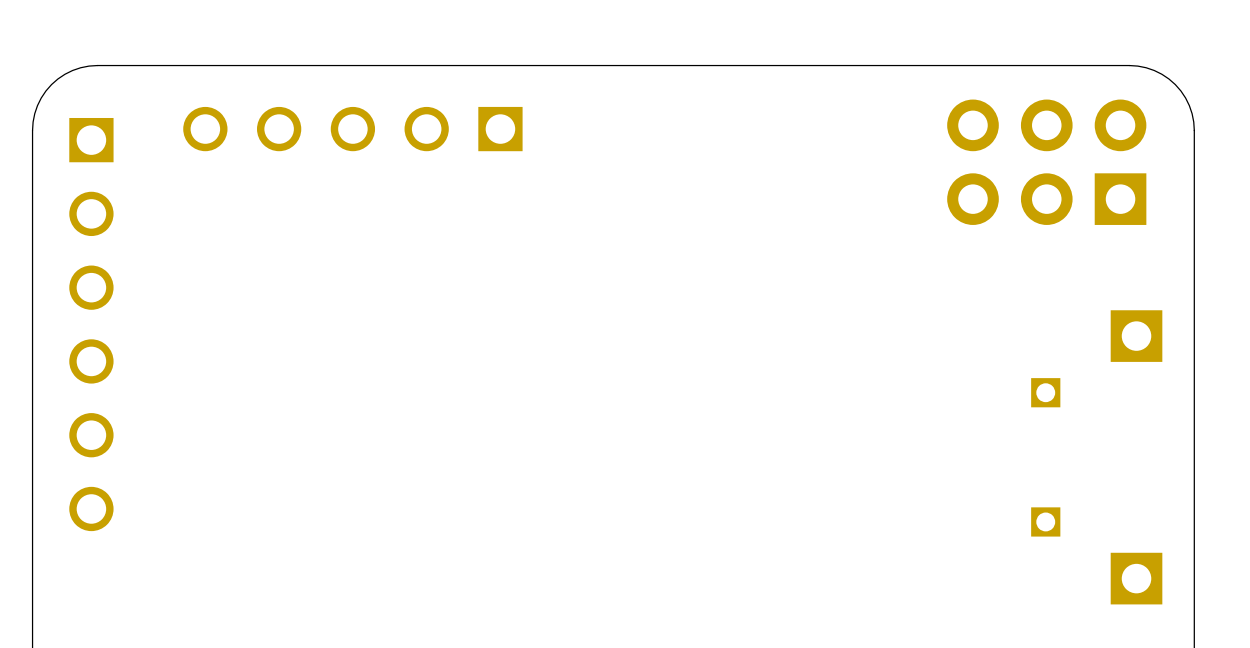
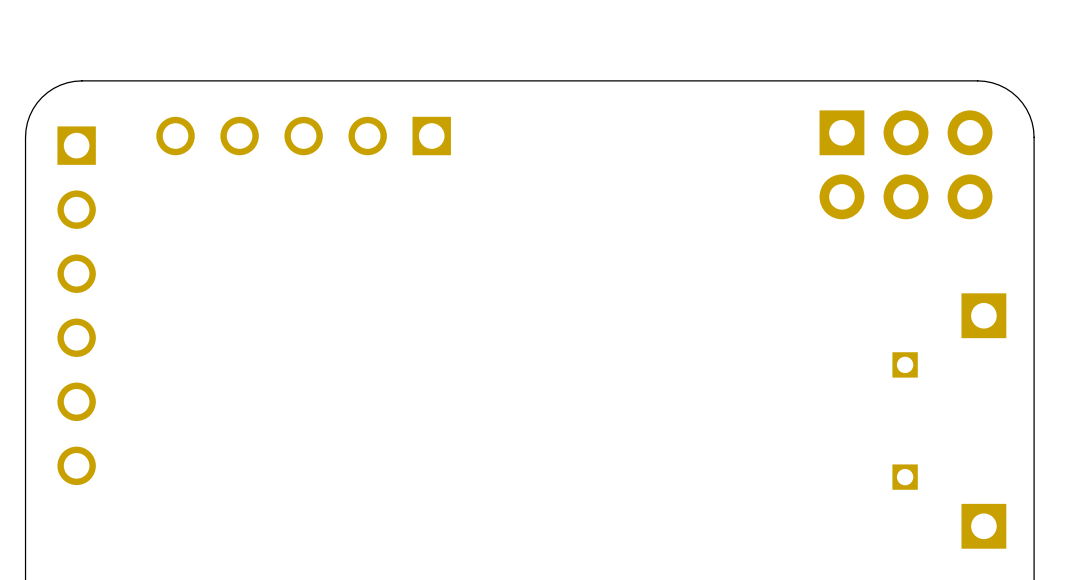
part rotation: 0° (1046, 162) -> 180° (905, 164)

